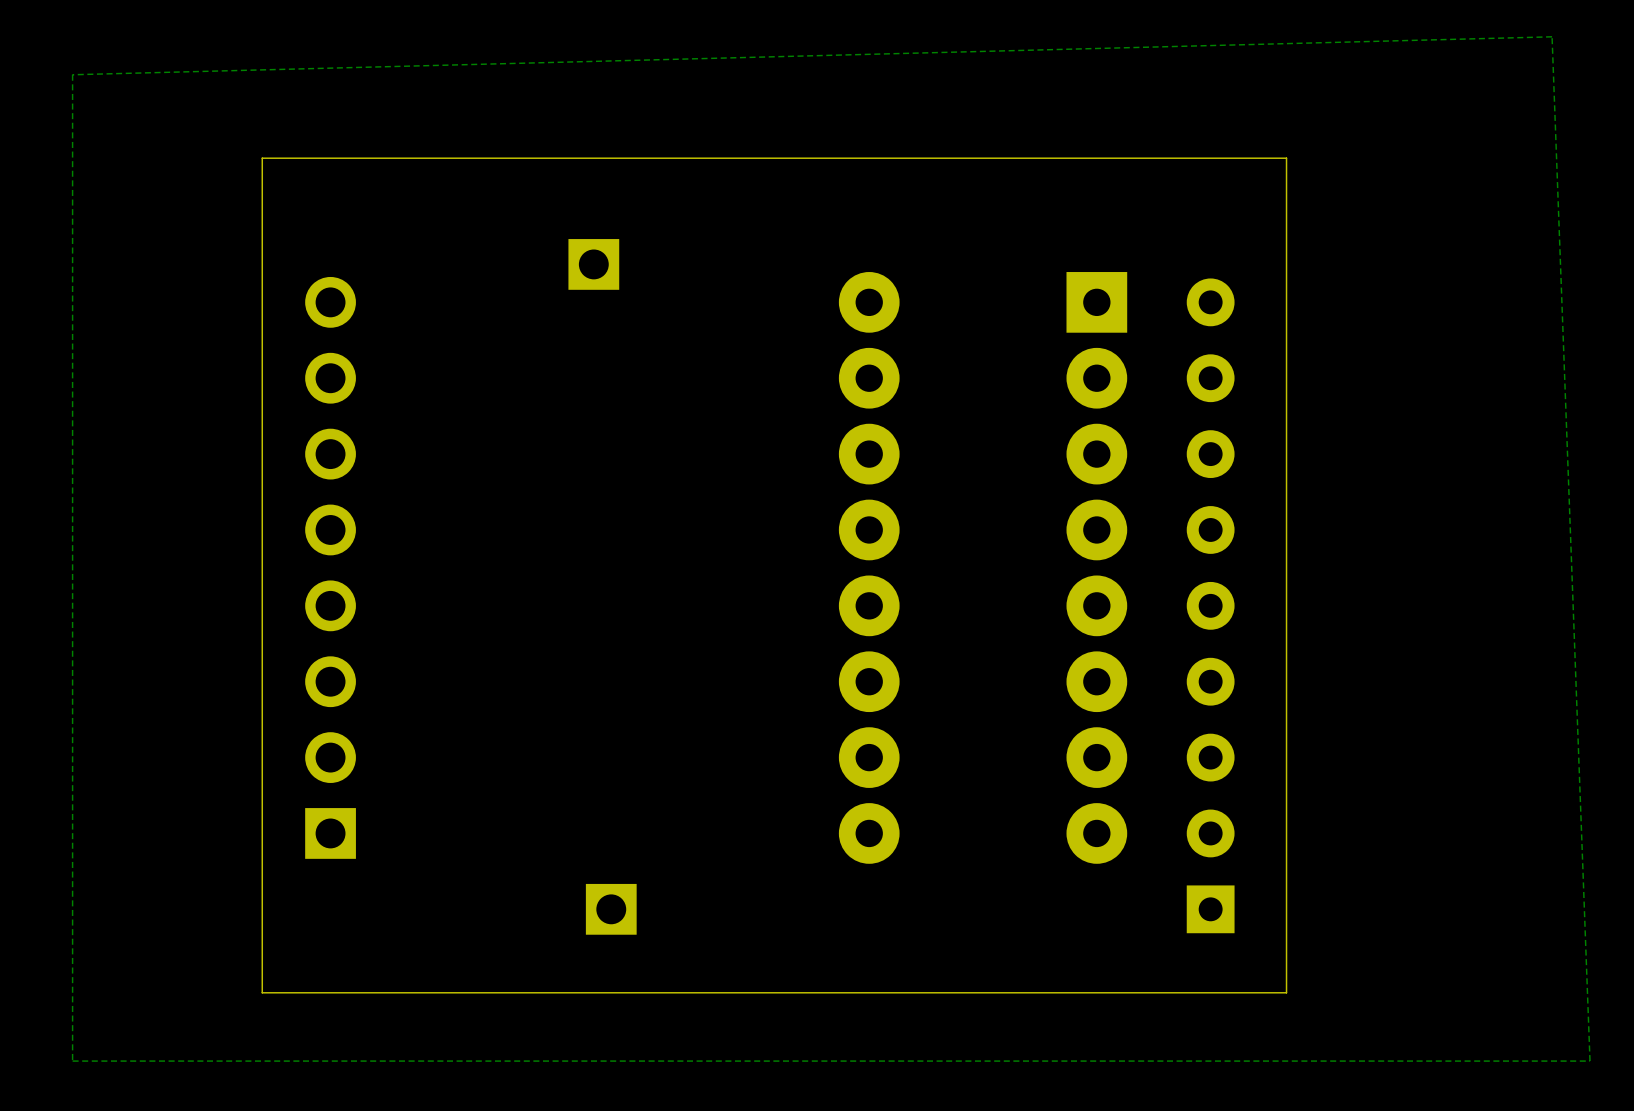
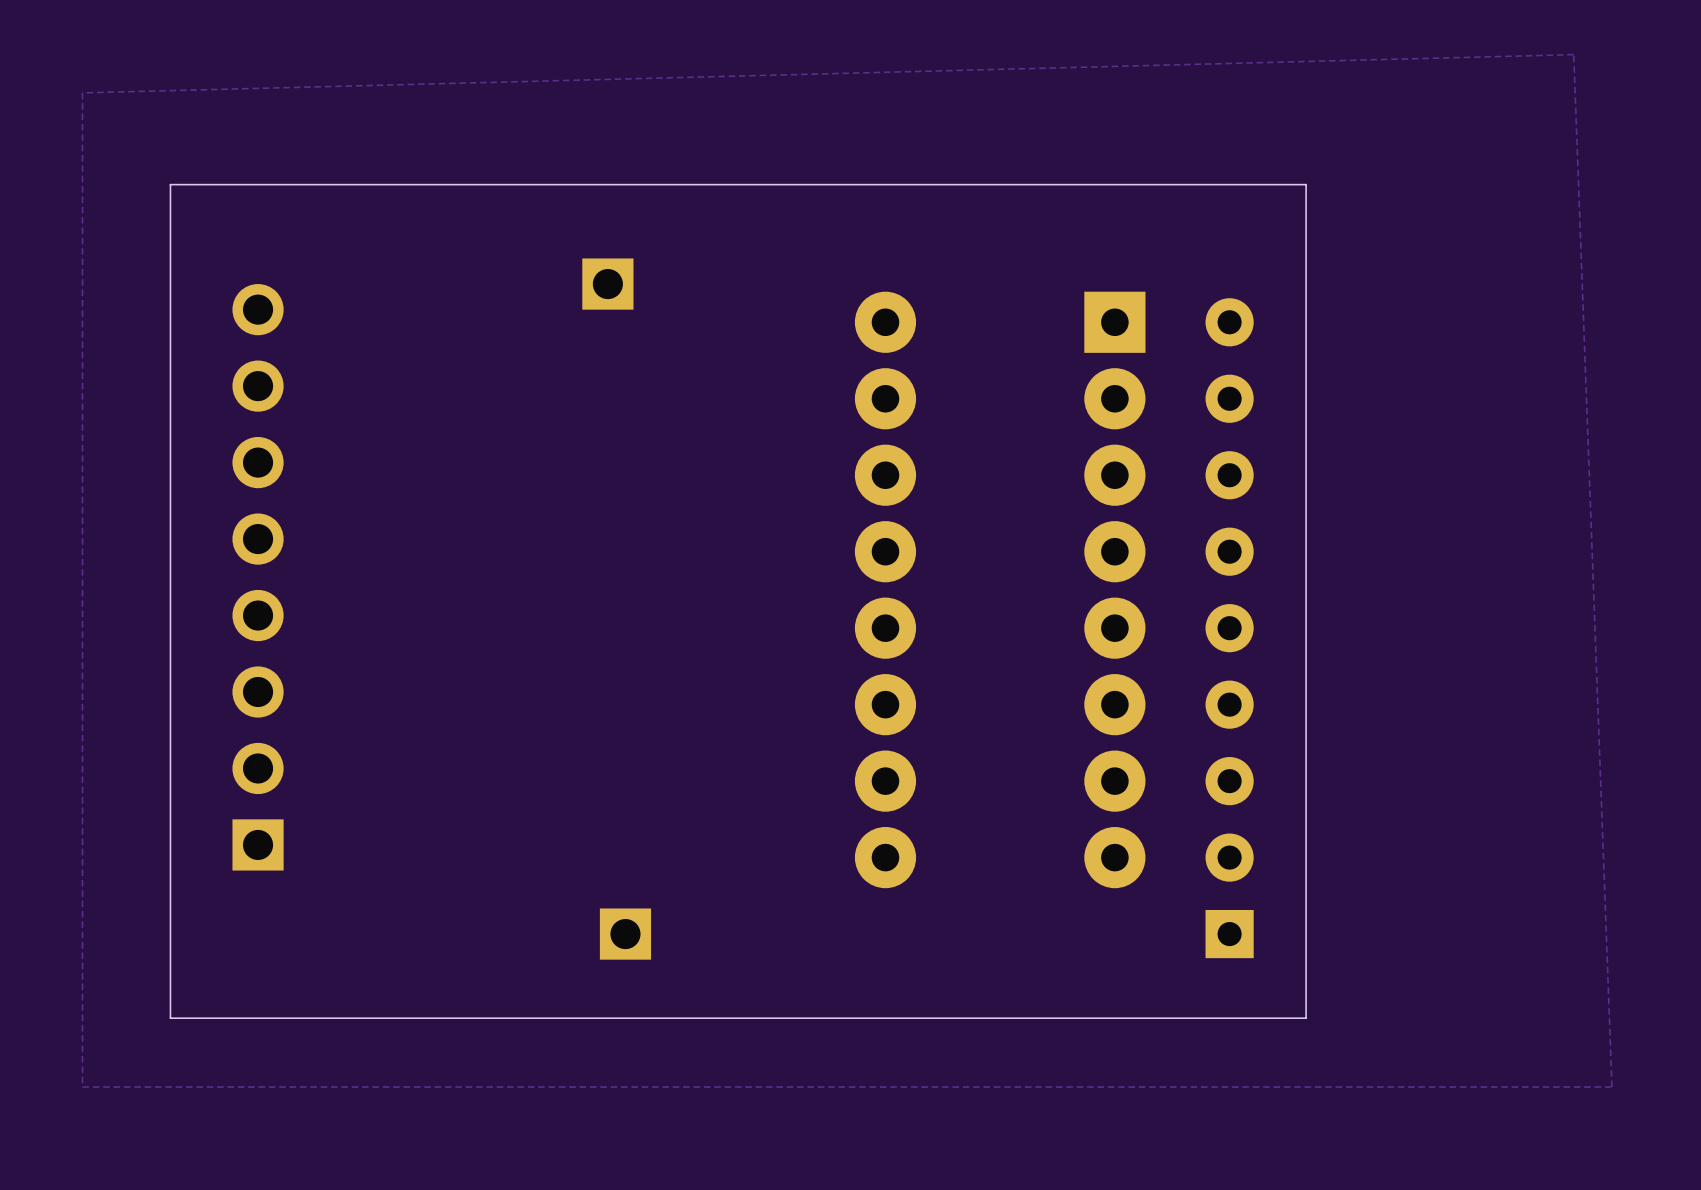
board edge: (1286, 165) (1286, 158) (262, 158) (262, 992) -> (1306, 184) (170, 184) (170, 1018) (273, 1018)
part position: (330, 567) -> (258, 577)

